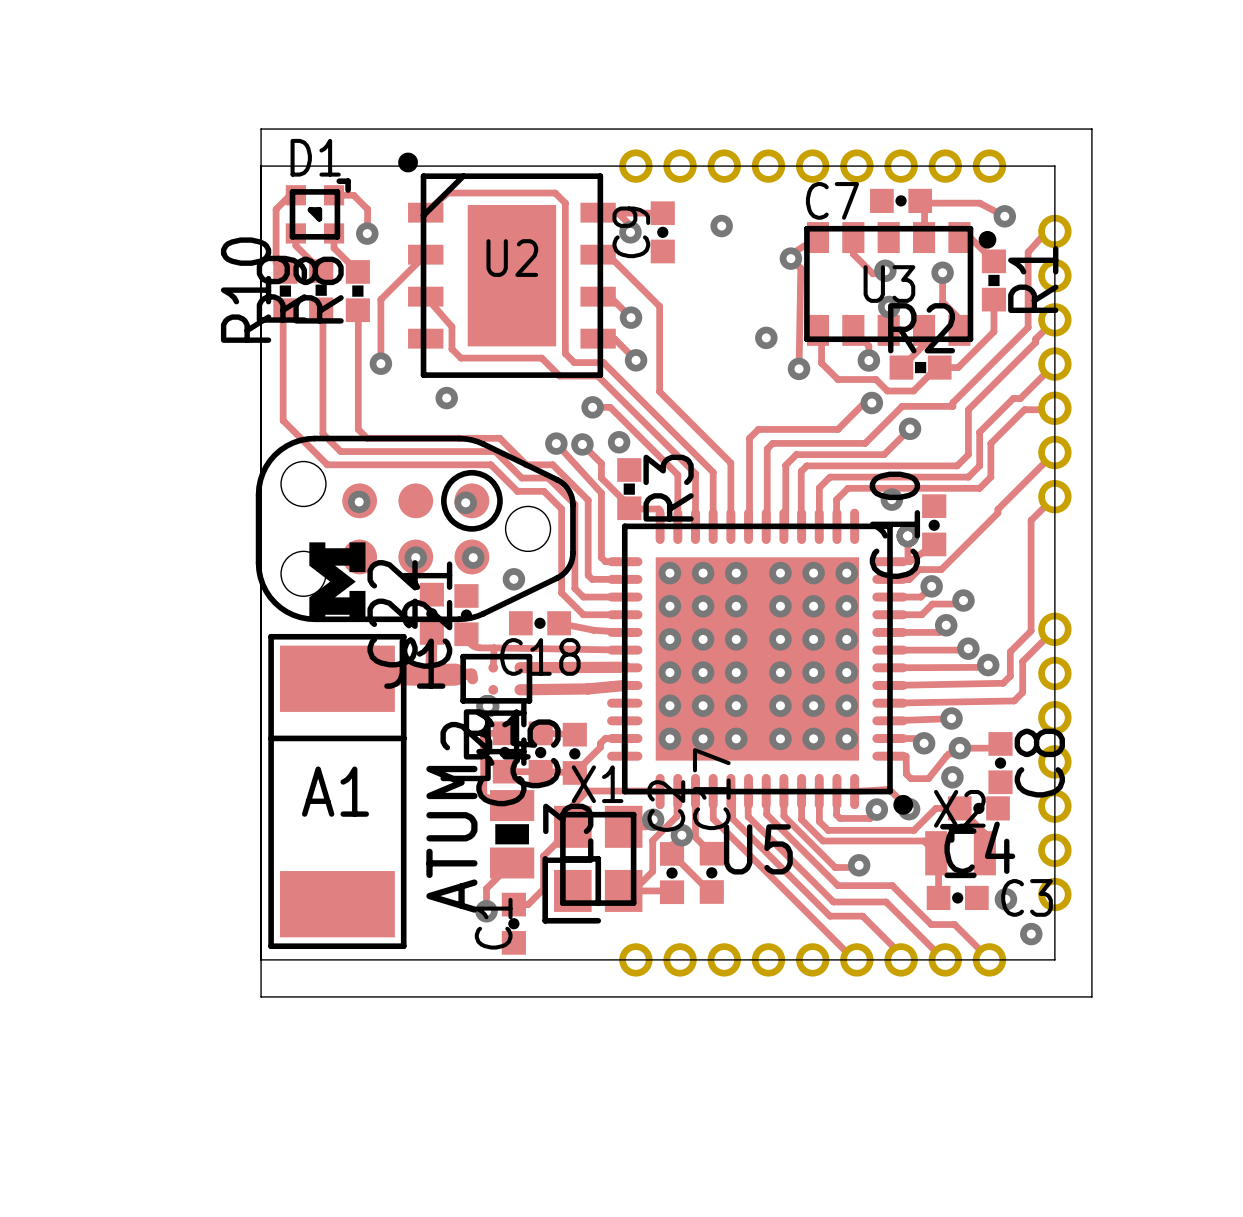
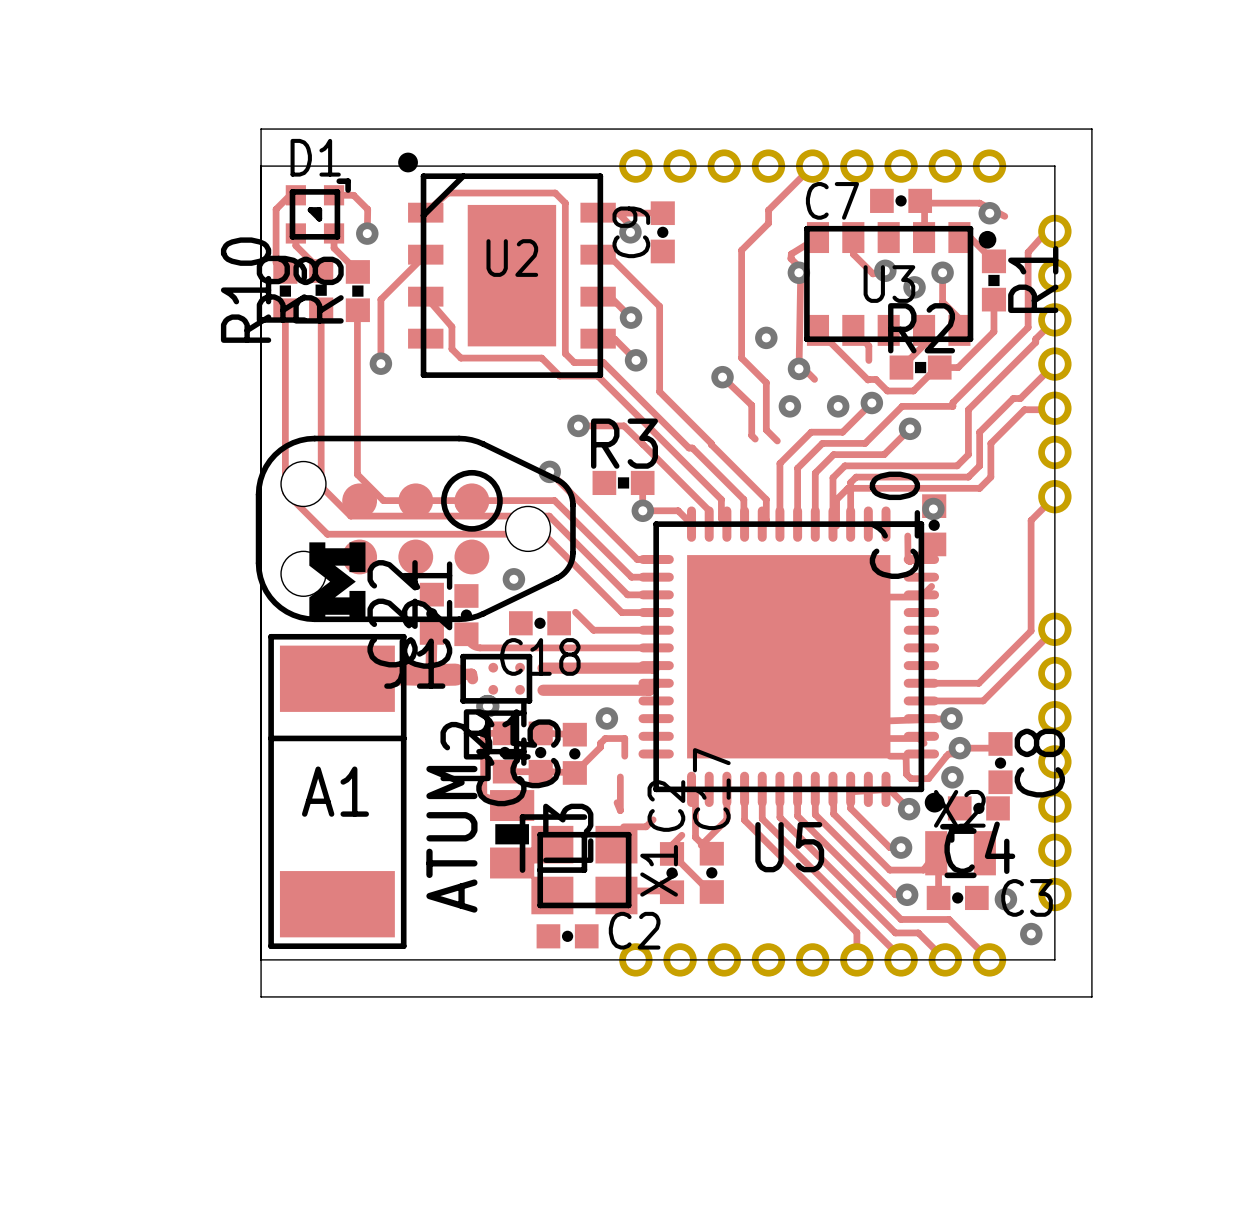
track: none -> (812, 166) (768, 210) (768, 223) (741, 250) (741, 358) (766, 382) (766, 429) (777, 440)
via position: (1004, 216) -> (989, 213)
via: (721, 226) -> none
via position: (790, 258) -> (798, 272)
via position: (889, 307) -> (914, 287)
track: (321, 309) (322, 311) (322, 433) (340, 451) (495, 451) (521, 478) (548, 478) (574, 504) (574, 588) (583, 597) (624, 597) -> (321, 309) (321, 486) (350, 516) (549, 516) (627, 594) (656, 594)
track: (285, 310) (283, 312) (283, 420) (327, 464) (490, 464) (517, 491) (543, 491) (561, 509) (561, 593) (583, 614) (624, 614) -> (285, 310) (285, 492) (327, 534) (543, 534) (621, 612) (656, 612)
track: (358, 310) (358, 429) (367, 438) (499, 438) (526, 464) (552, 464) (588, 500) (588, 575) (592, 579) (624, 579) -> (357, 310) (357, 474) (383, 500) (554, 500) (631, 577) (656, 577)
track: (817, 330) (821, 333) (821, 363) (837, 379) (868, 379) -> (818, 330) (867, 379)
via: (868, 360) -> none
track: none -> (807, 372) (814, 379)
track: none -> (722, 377) (751, 405) (751, 435) (755, 439)
via: none -> (722, 377)
via: (446, 398) -> none
track: (871, 402) (864, 402) (837, 429) (758, 429) (749, 438) (748, 526) -> (871, 402) (842, 432) (811, 432) (779, 463) (779, 524)
via: none -> (789, 406)
via: none -> (838, 406)
track: (592, 407) (610, 407) (677, 474) (677, 526) -> none
via: (592, 407) -> none
track: none -> (578, 425) (623, 425) (709, 510) (709, 524)
via: none -> (578, 425)
via: (619, 442) -> none
track: (556, 443) (601, 493) (601, 557) (605, 561) (624, 561) -> none
via: (556, 443) -> none
track: (711, 443) (730, 462) (730, 526) -> (711, 443) (766, 499) (766, 520) (762, 524)
track: (822, 443) (772, 443) (767, 448) (766, 526) -> (822, 443) (797, 468) (797, 524)
track: (582, 444) (601, 463) (601, 478) (629, 505) (630, 509) (660, 510) (660, 526) -> none
via: (582, 444) -> none
track: (688, 448) (713, 472) (713, 526) -> (688, 448) (692, 448) (743, 499) (744, 524)
track: (1054, 452) (941, 569) (919, 569) (909, 579) (890, 579) -> none
track: (833, 454) (796, 454) (785, 465) (785, 524) (783, 526) -> (833, 454) (815, 473) (815, 524)
track: (844, 465) (806, 465) (801, 471) (801, 525) -> (844, 465) (832, 477) (832, 524)
track: none -> (549, 471) (637, 559) (656, 559)
via: none -> (549, 471)
track: (695, 473) (695, 526) -> (695, 473) (721, 499) (721, 518) (726, 524)
track: (856, 477) (830, 477) (819, 487) (819, 526) -> (856, 477) (850, 482) (850, 524)
track: none -> (642, 482) (642, 510) (678, 510) (691, 524)
R3 rotation: 0° (629, 489) -> 90° clockwise (623, 482)
via: (891, 499) -> none
via: (359, 501) -> none
via: (465, 502) -> none
via: none -> (933, 509)
via: none -> (642, 510)
via: (907, 535) -> none
via: (415, 557) -> none
via: (473, 557) -> none
via: (669, 573) -> none
via: (703, 573) -> none
via: (736, 573) -> none
via: (780, 573) -> none
via: (813, 573) -> none
via: (846, 573) -> none
via: (931, 586) -> none
track: (963, 600) (959, 604) (932, 604) (921, 614) (890, 614) -> none
via: (963, 600) -> none
via: (669, 606) -> none
via: (703, 606) -> none
via: (736, 606) -> none
via: (780, 606) -> none
via: (813, 606) -> none
via: (846, 606) -> none
track: none -> (575, 612) (593, 630) (656, 630)
track: (559, 623) (593, 630) (624, 632) -> none
track: (946, 625) (939, 632) (890, 632) -> none
via: (946, 625) -> none
via: (669, 639) -> none
via: (703, 639) -> none
via: (736, 639) -> none
via: (780, 639) -> none
via: (813, 639) -> none
via: (846, 639) -> none
track: none -> (494, 647) (656, 647)
track: (968, 648) (890, 650) -> none
via: (968, 648) -> none
track: (624, 650) (494, 647) (493, 667) -> none
track: (1010, 651) (1010, 676) (1003, 683) (890, 685) -> (1010, 651) (978, 683) (921, 683)
U5 position: (760, 661) -> (791, 659)
track: (1022, 661) (1022, 692) (1014, 700) (890, 703) -> (1022, 661) (983, 700) (921, 700)
track: none -> (656, 665) (653, 668) (543, 668)
track: (988, 665) (984, 667) (890, 667) -> none
via: (988, 665) -> none
track: (625, 667) (520, 667) -> none
via: (669, 672) -> none
via: (703, 672) -> none
via: (736, 672) -> none
via: (780, 672) -> none
via: (813, 672) -> none
via: (846, 672) -> none
track: none -> (656, 683) (649, 690) (543, 690)
track: (624, 685) (588, 688) (520, 689) -> none
via: (669, 705) -> none
via: (703, 705) -> none
via: (736, 705) -> none
via: (780, 705) -> none
via: (813, 705) -> none
via: (846, 705) -> none
via: none -> (606, 718)
via: (669, 738) -> none
via: (703, 738) -> none
via: (736, 738) -> none
via: (780, 738) -> none
via: (813, 738) -> none
via: (846, 738) -> none
via: (924, 743) -> none
track: none -> (620, 776) (620, 810) (617, 802)
track: none -> (726, 789) (726, 819) (701, 845)
track: none -> (815, 789) (815, 814) (895, 894) (907, 894)
track: none -> (850, 789) (850, 808) (889, 847) (901, 847)
track: (659, 791) (587, 791) (572, 805) (572, 826) (543, 856) (543, 889) (528, 904) (513, 904) -> none
track: (677, 791) (677, 816) (652, 840) (652, 871) (633, 890) -> none
track: (713, 791) (713, 818) (854, 959) (856, 959) -> (744, 789) (744, 820) (856, 932) (856, 959)
track: (730, 791) (732, 793) (732, 818) (829, 916) (862, 916) (901, 954) (901, 957) -> (762, 789) (762, 818) (901, 957)
track: (748, 791) (748, 816) (833, 901) (886, 901) (945, 959) -> (779, 789) (779, 817) (895, 932) (918, 932) (945, 959)
track: (783, 791) (783, 816) (835, 867) (856, 867) (859, 865) -> none
track: (801, 791) (801, 819) (822, 840) (924, 840) (936, 853) -> (832, 789) (833, 813) (889, 870) (923, 870) (936, 853)
track: (819, 791) (819, 821) (828, 830) (913, 830) (935, 808) (959, 808) (984, 833) (984, 853) -> none
track: (836, 791) (836, 814) (840, 818) (870, 818) (876, 809) -> none
track: (766, 792) (766, 814) (837, 885) (892, 885) (931, 924) (954, 924) (989, 959) -> (797, 789) (797, 816) (901, 919) (949, 919) (989, 959)
via: (876, 809) -> none
via: (653, 819) -> none
via: (681, 835) -> none
via: none -> (901, 847)
track: (512, 863) (486, 888) (486, 911) -> none
X1 rotation: 0° (592, 864) -> 90° clockwise (578, 864)
via: (859, 865) -> none
via: none -> (907, 894)
via: (486, 911) -> none
C1: (513, 923) -> none
C2: none -> (567, 936)

